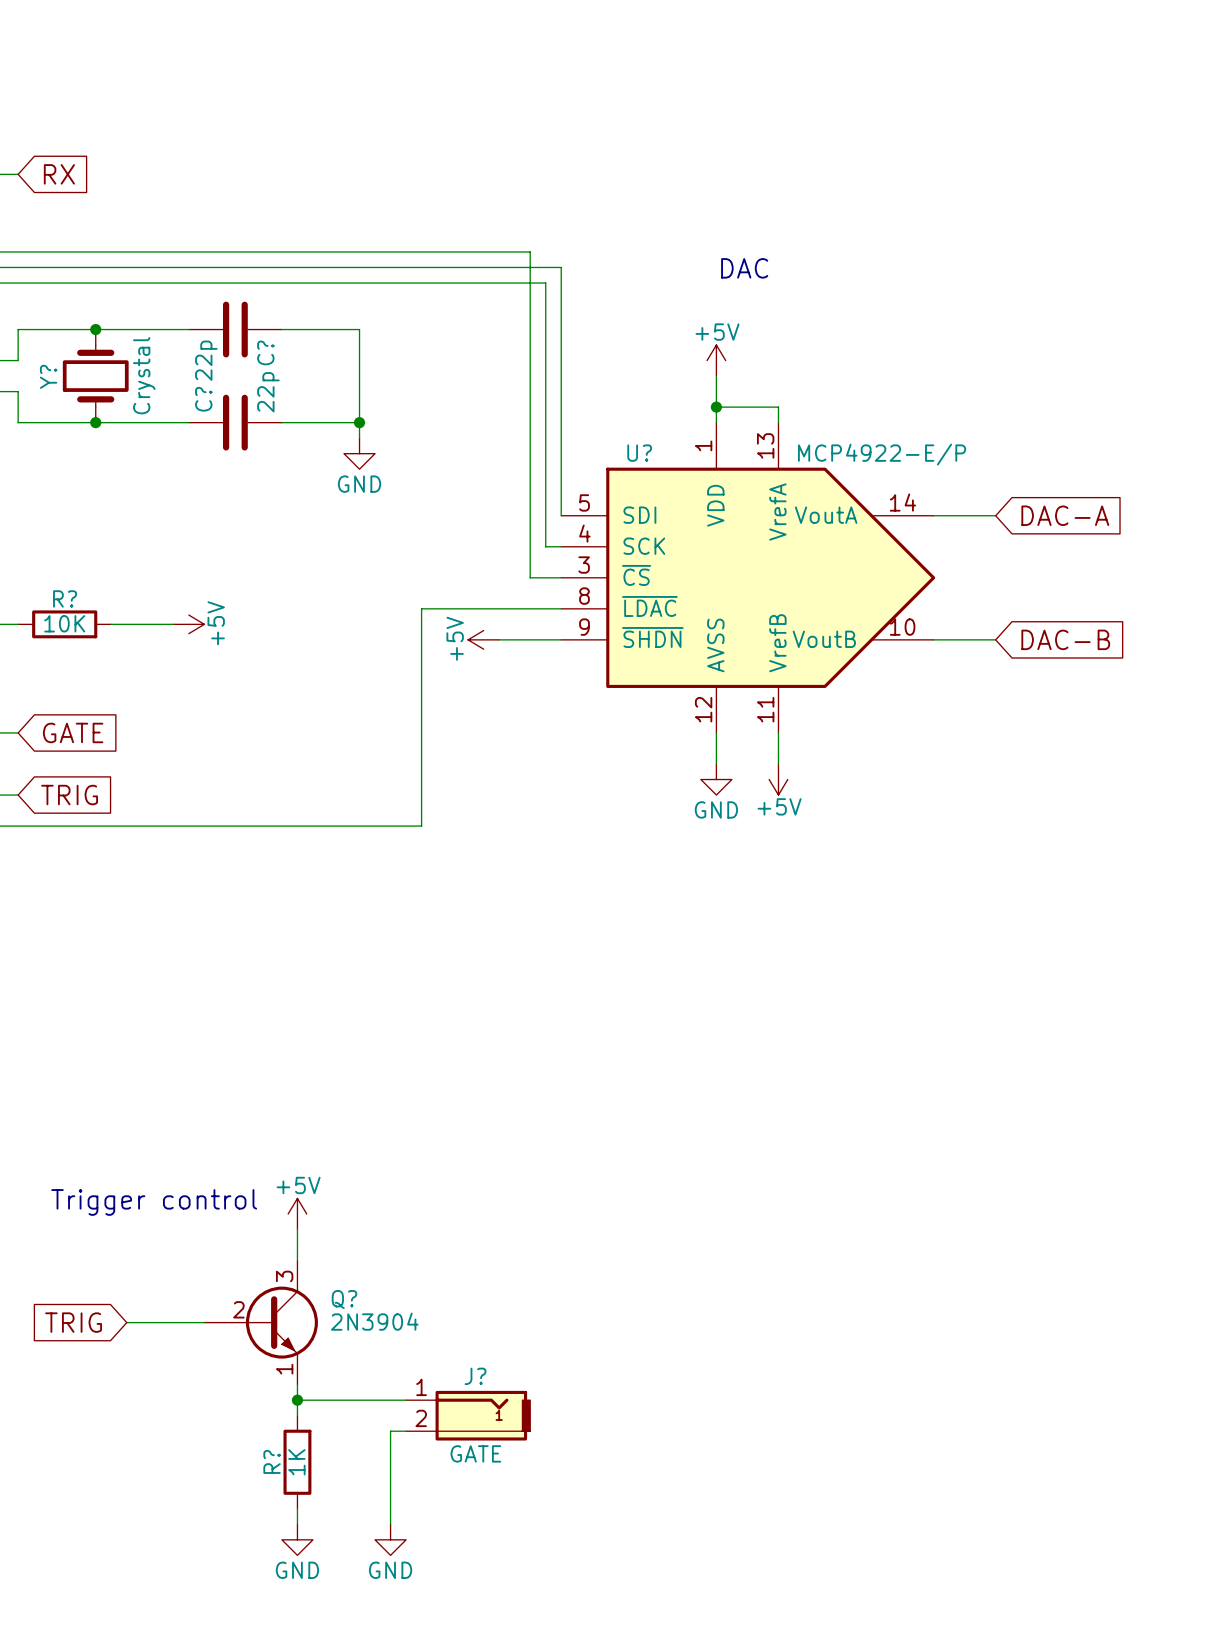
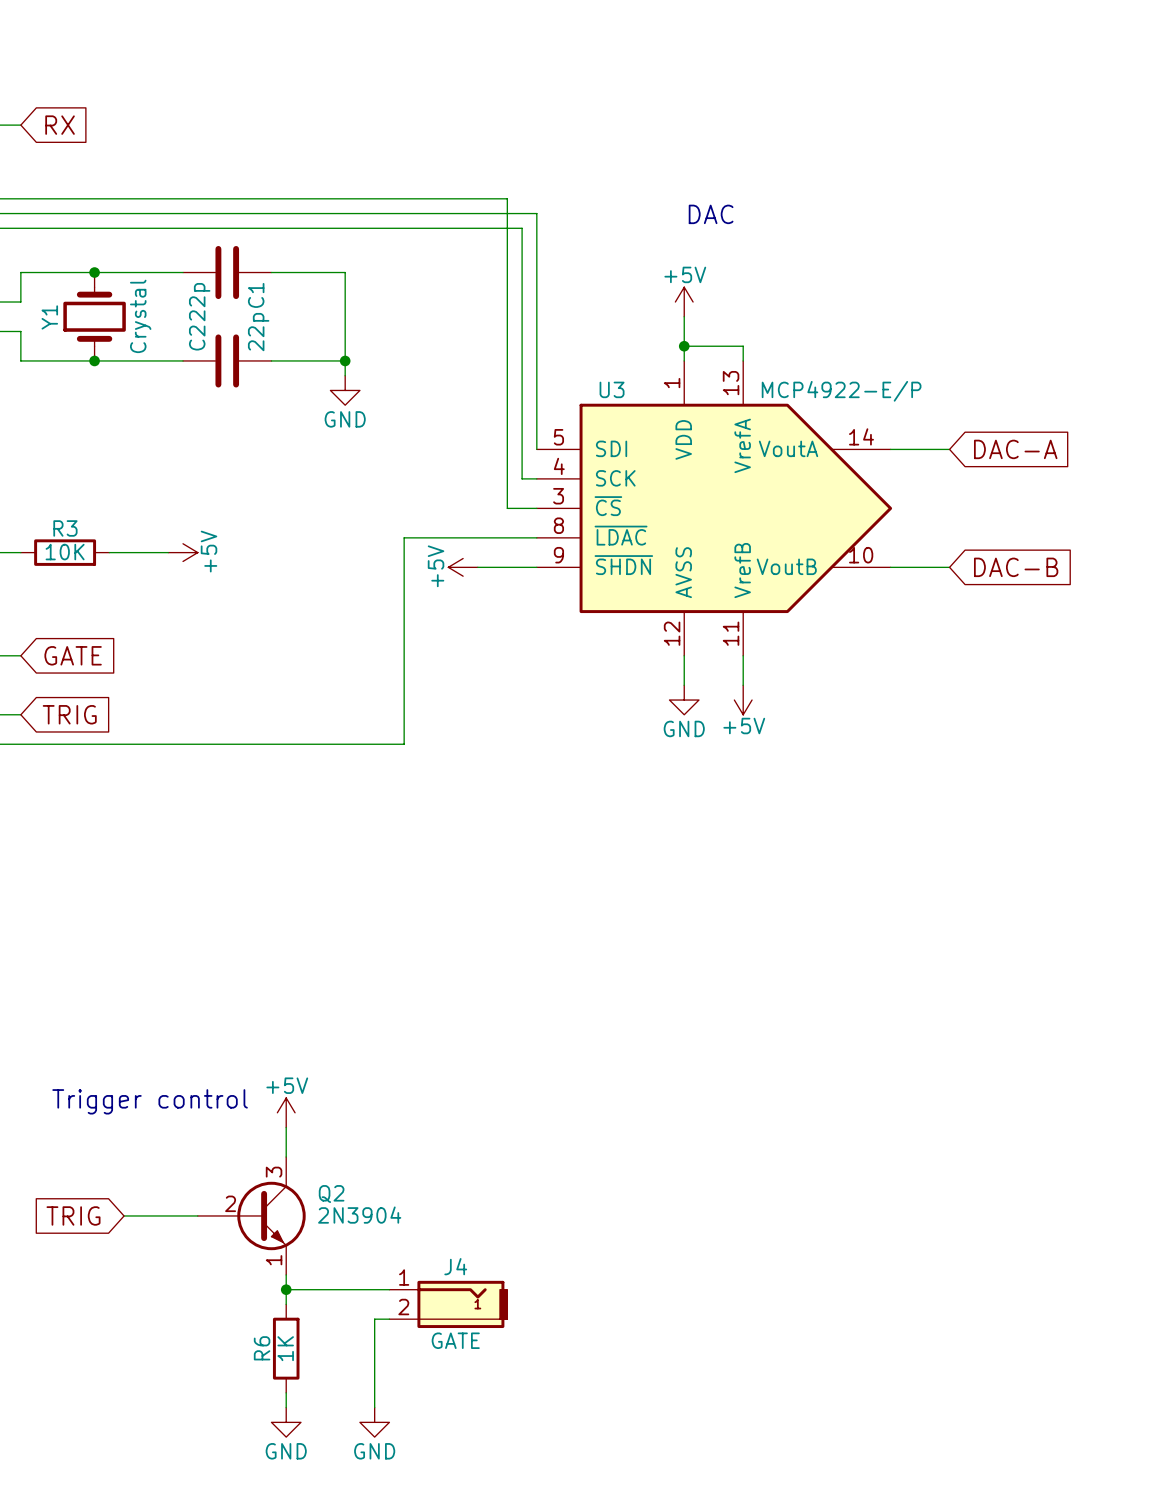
C? name: C? (265, 352) -> C1 (256, 295)
Y? name: Y? (48, 376) -> Y1 (49, 317)
C? name: C? (203, 399) -> C2 (197, 338)
U? name: U? (639, 453) -> U3 (612, 389)
R? name: R? (65, 598) -> R3 (65, 528)
Q? name: Q? (344, 1299) -> Q2 (331, 1194)
J? name: J? (475, 1376) -> J4 (455, 1266)
R? name: R? (272, 1461) -> R6 (262, 1348)

